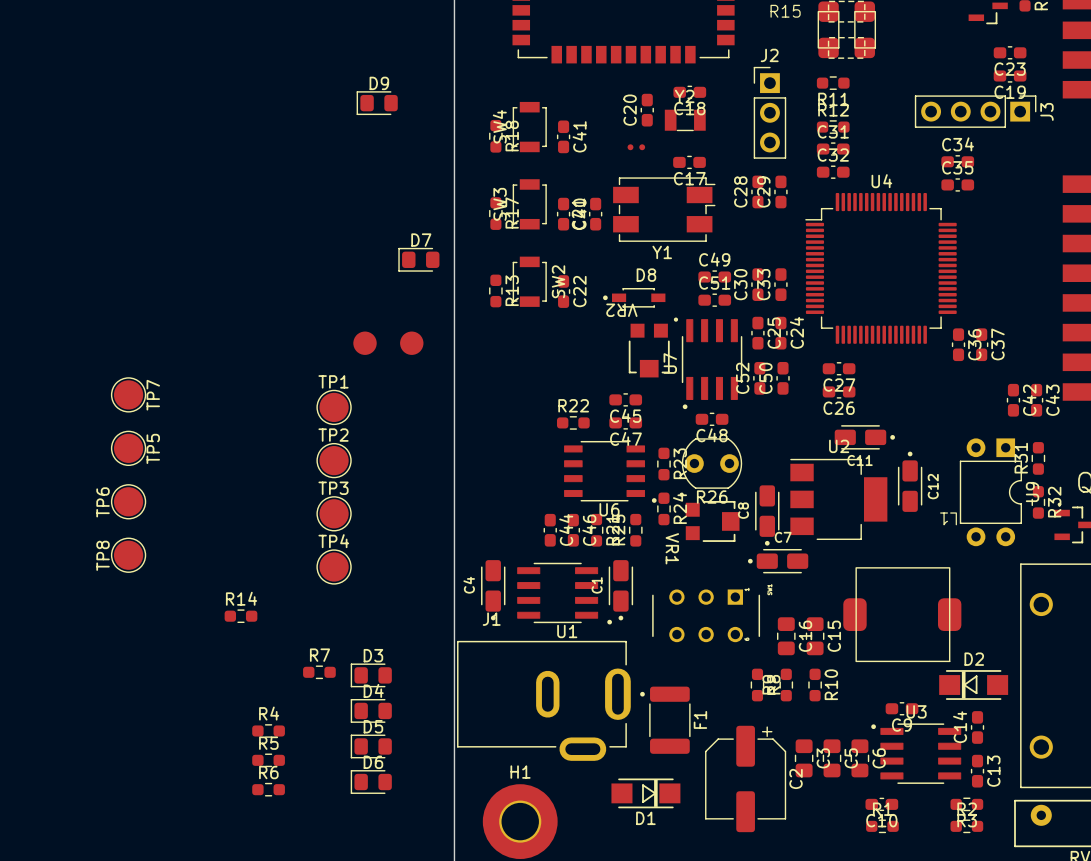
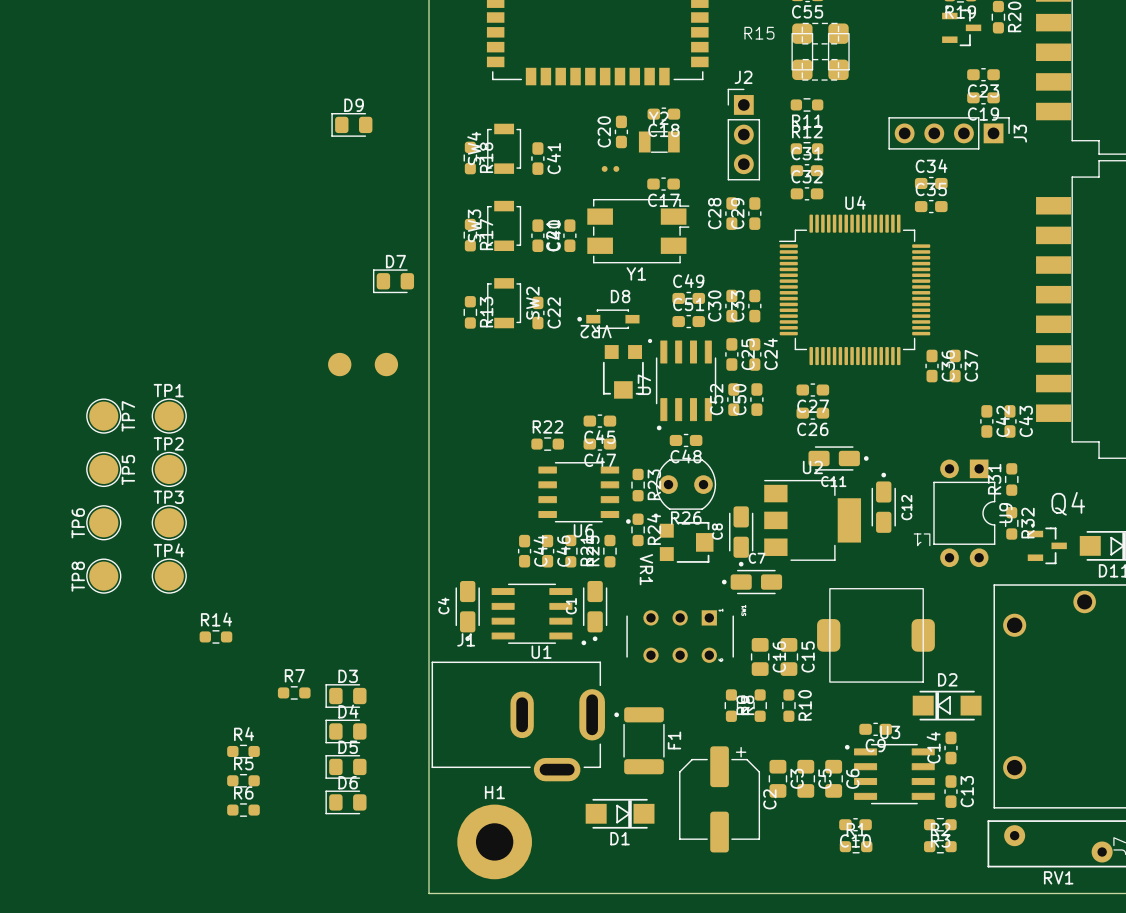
TP1 position: (334, 407) -> (169, 416)
TP2 position: (334, 460) -> (169, 469)
TP3 position: (334, 513) -> (169, 522)
TP4 position: (334, 567) -> (169, 576)

